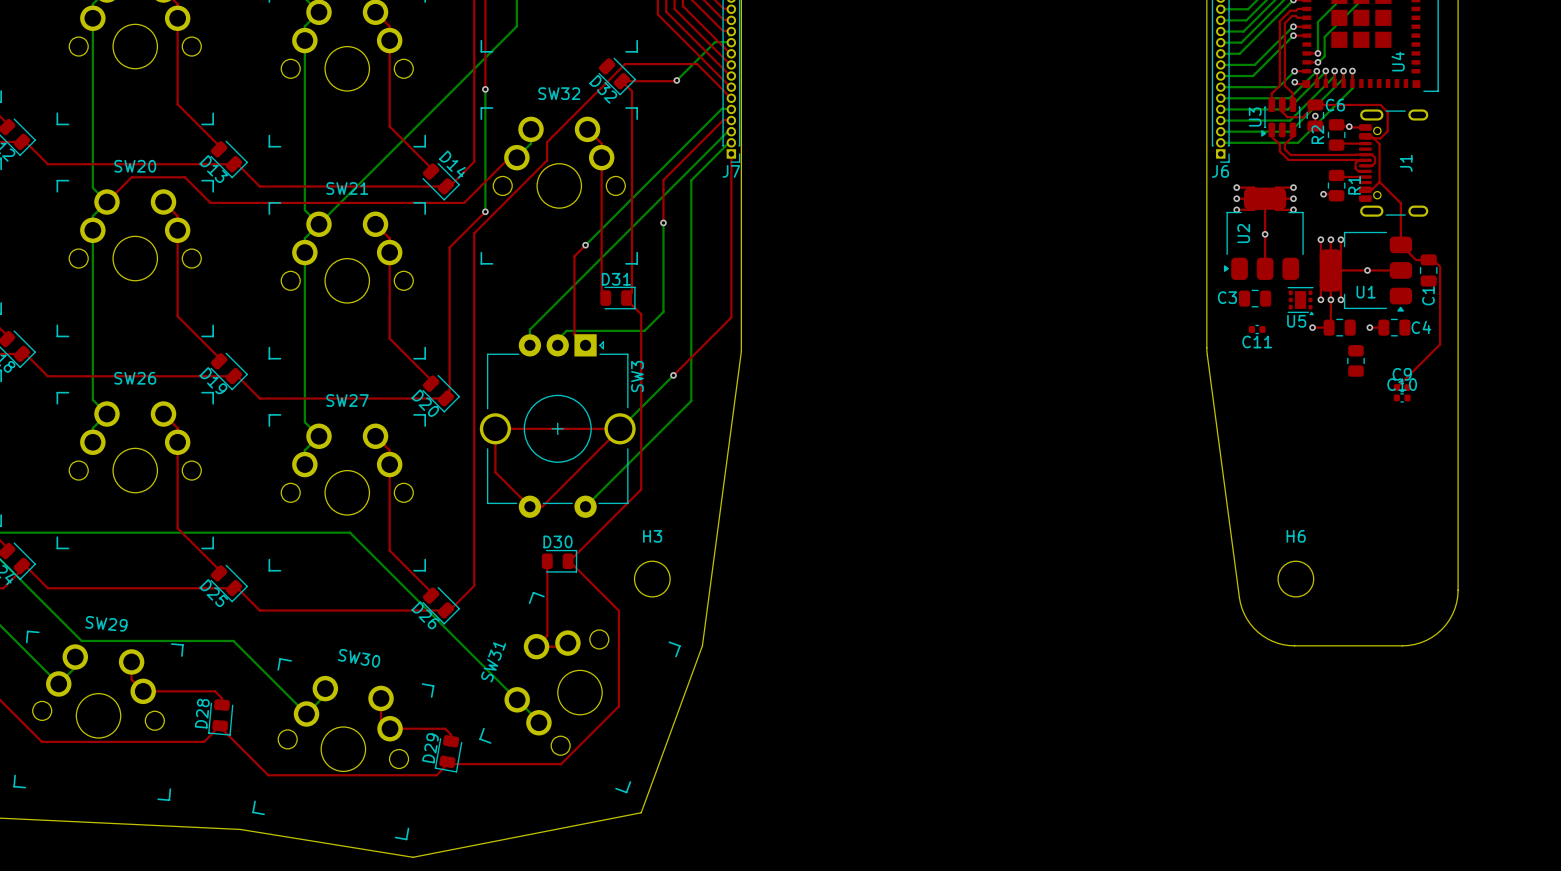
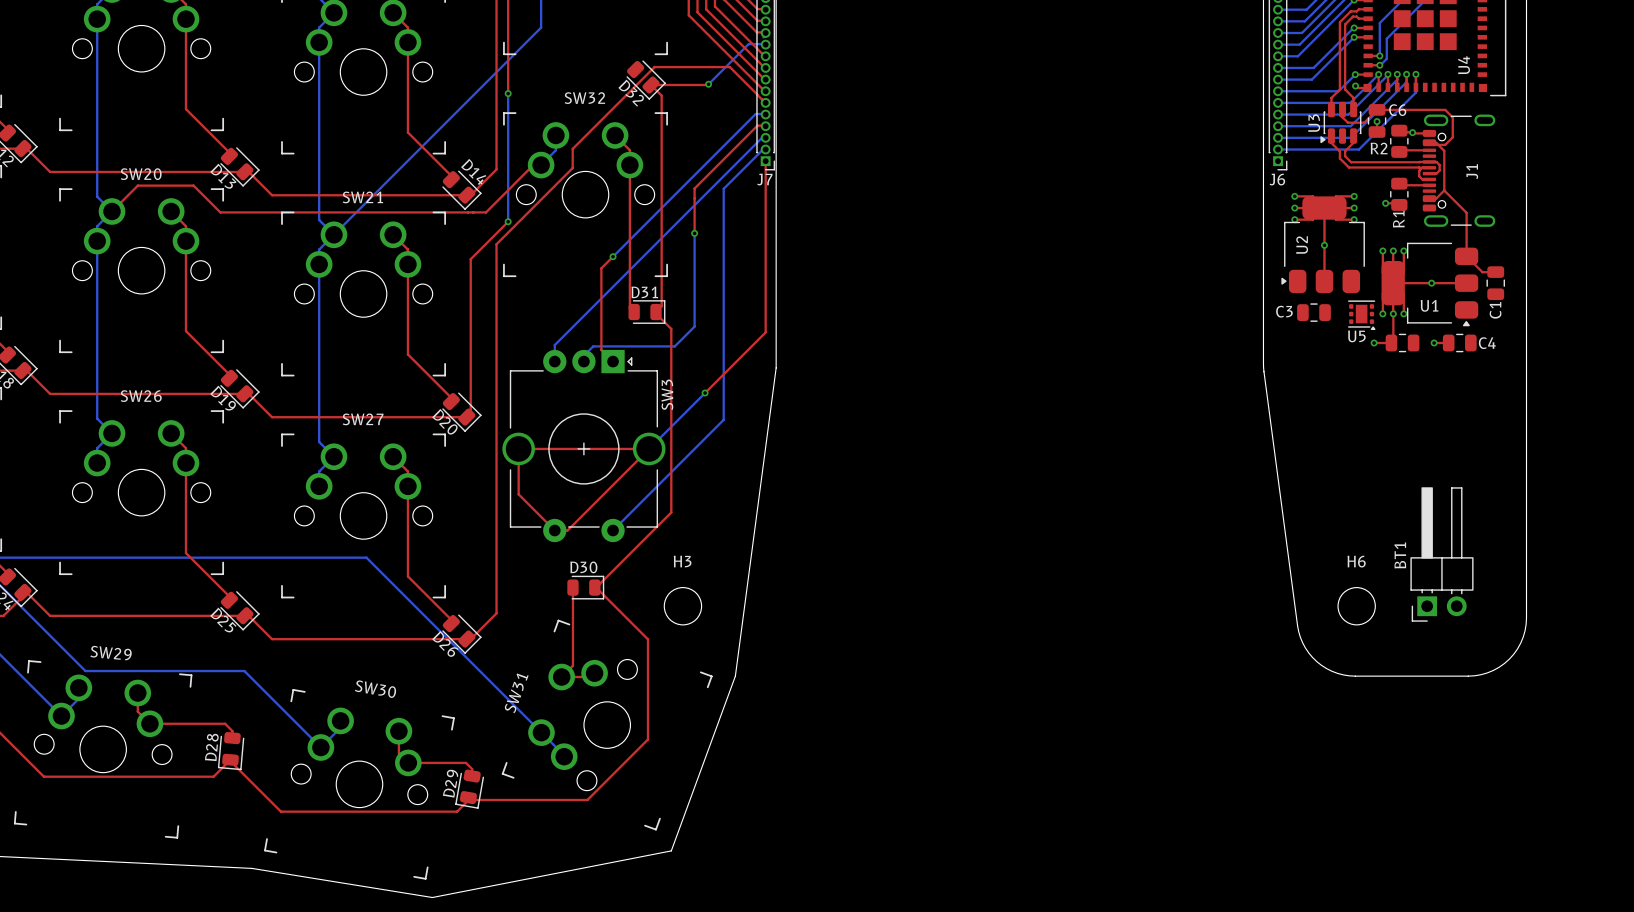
R2 name rotation: 0° (1317, 134) -> 90° clockwise (1379, 148)
R1 name position: R1 (1354, 185) -> R1 (1398, 219)
top track: (1433, 259) (1440, 266) (1440, 344) (1396, 387) -> none
C11: (1257, 329) -> none
part: (1355, 360) -> none
C9: (1402, 387) -> none
C10: (1402, 397) -> none
BT1: none -> (1441, 554)

